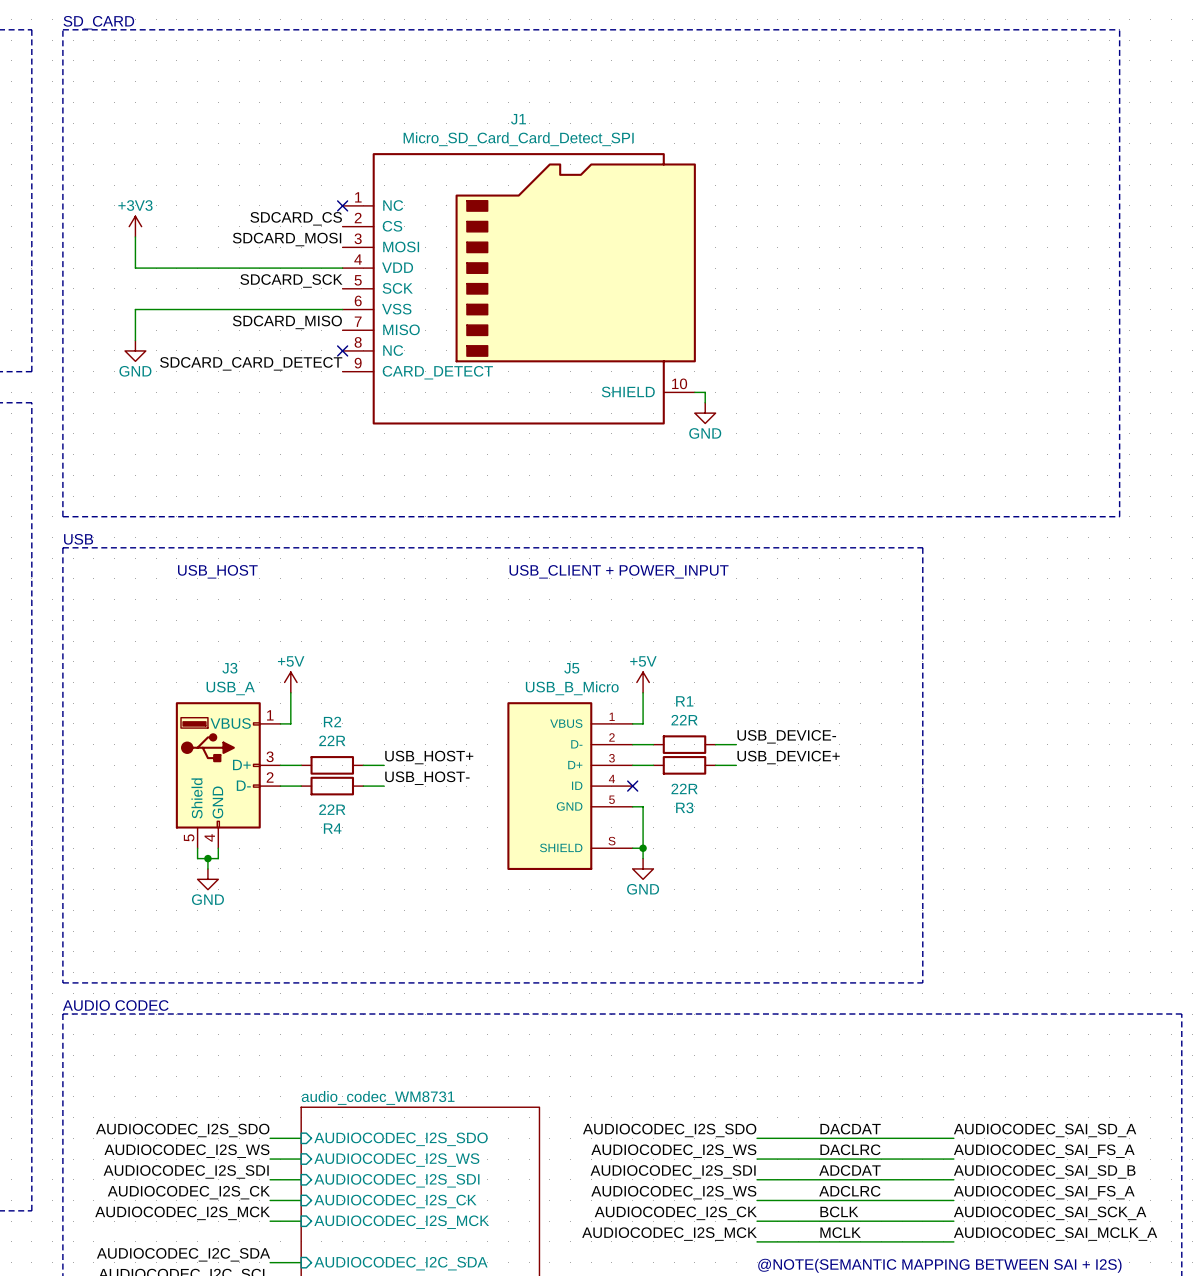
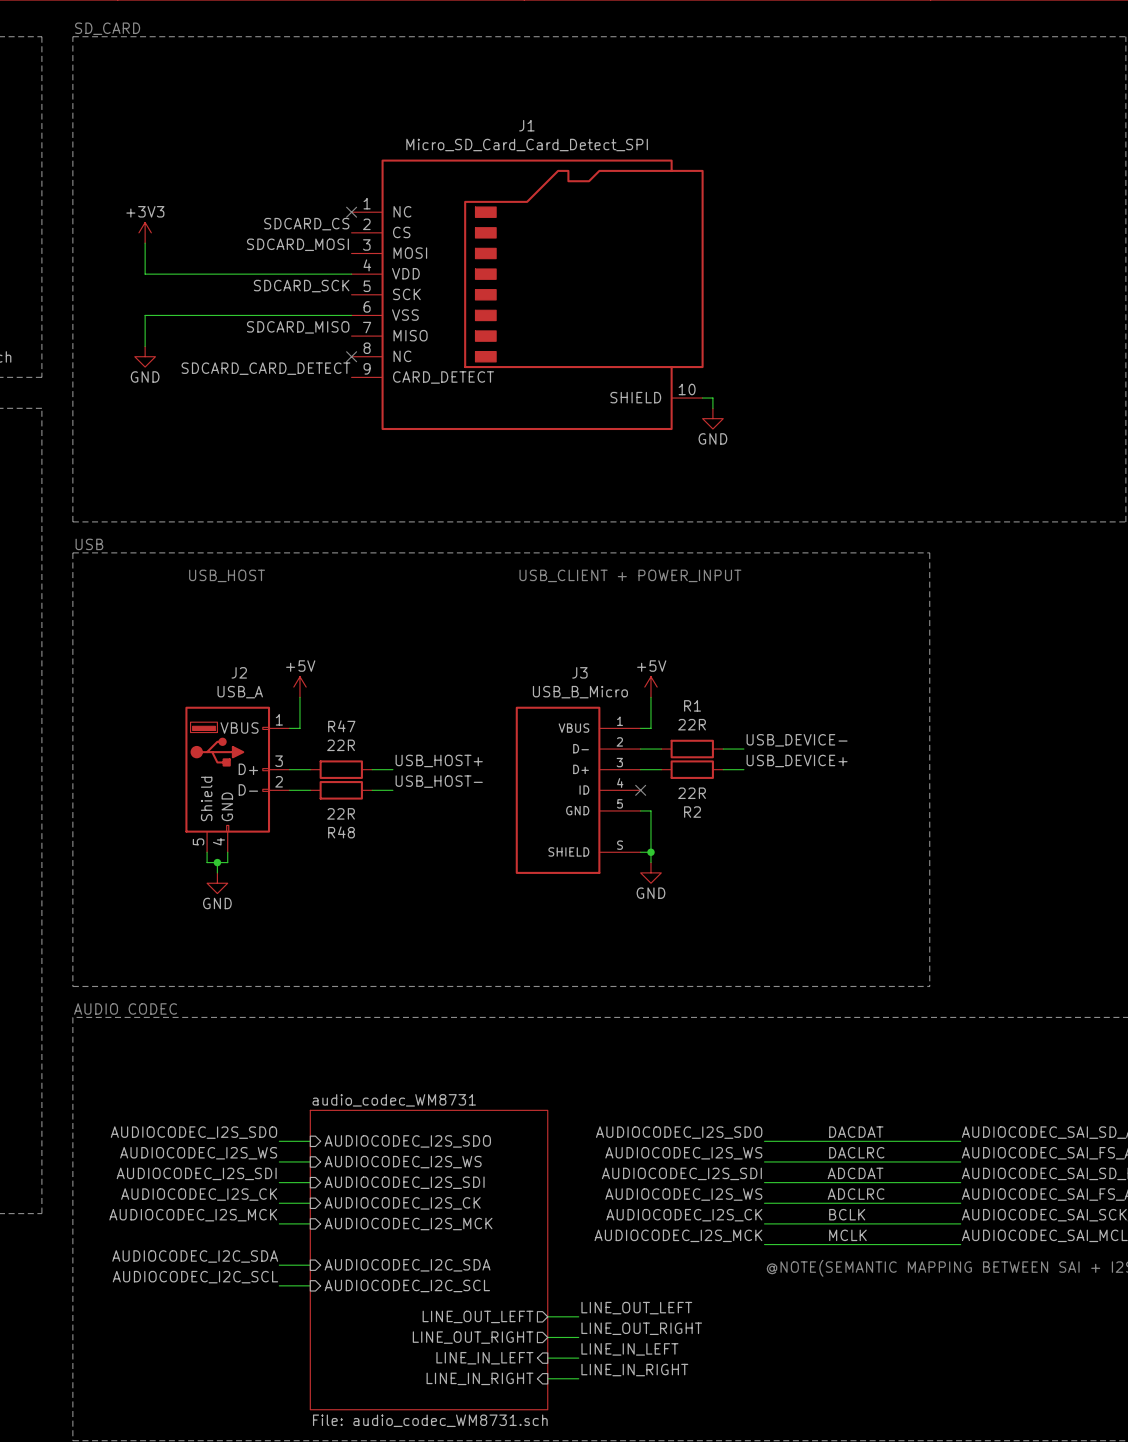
J3 name: J3 (229, 668) -> J2 (239, 672)
J5 name: J5 (571, 668) -> J3 (579, 672)
R2 name: R2 (332, 722) -> R47 (341, 726)
R3 name: R3 (684, 807) -> R2 (692, 812)
R4 name: R4 (332, 828) -> R48 (341, 832)

